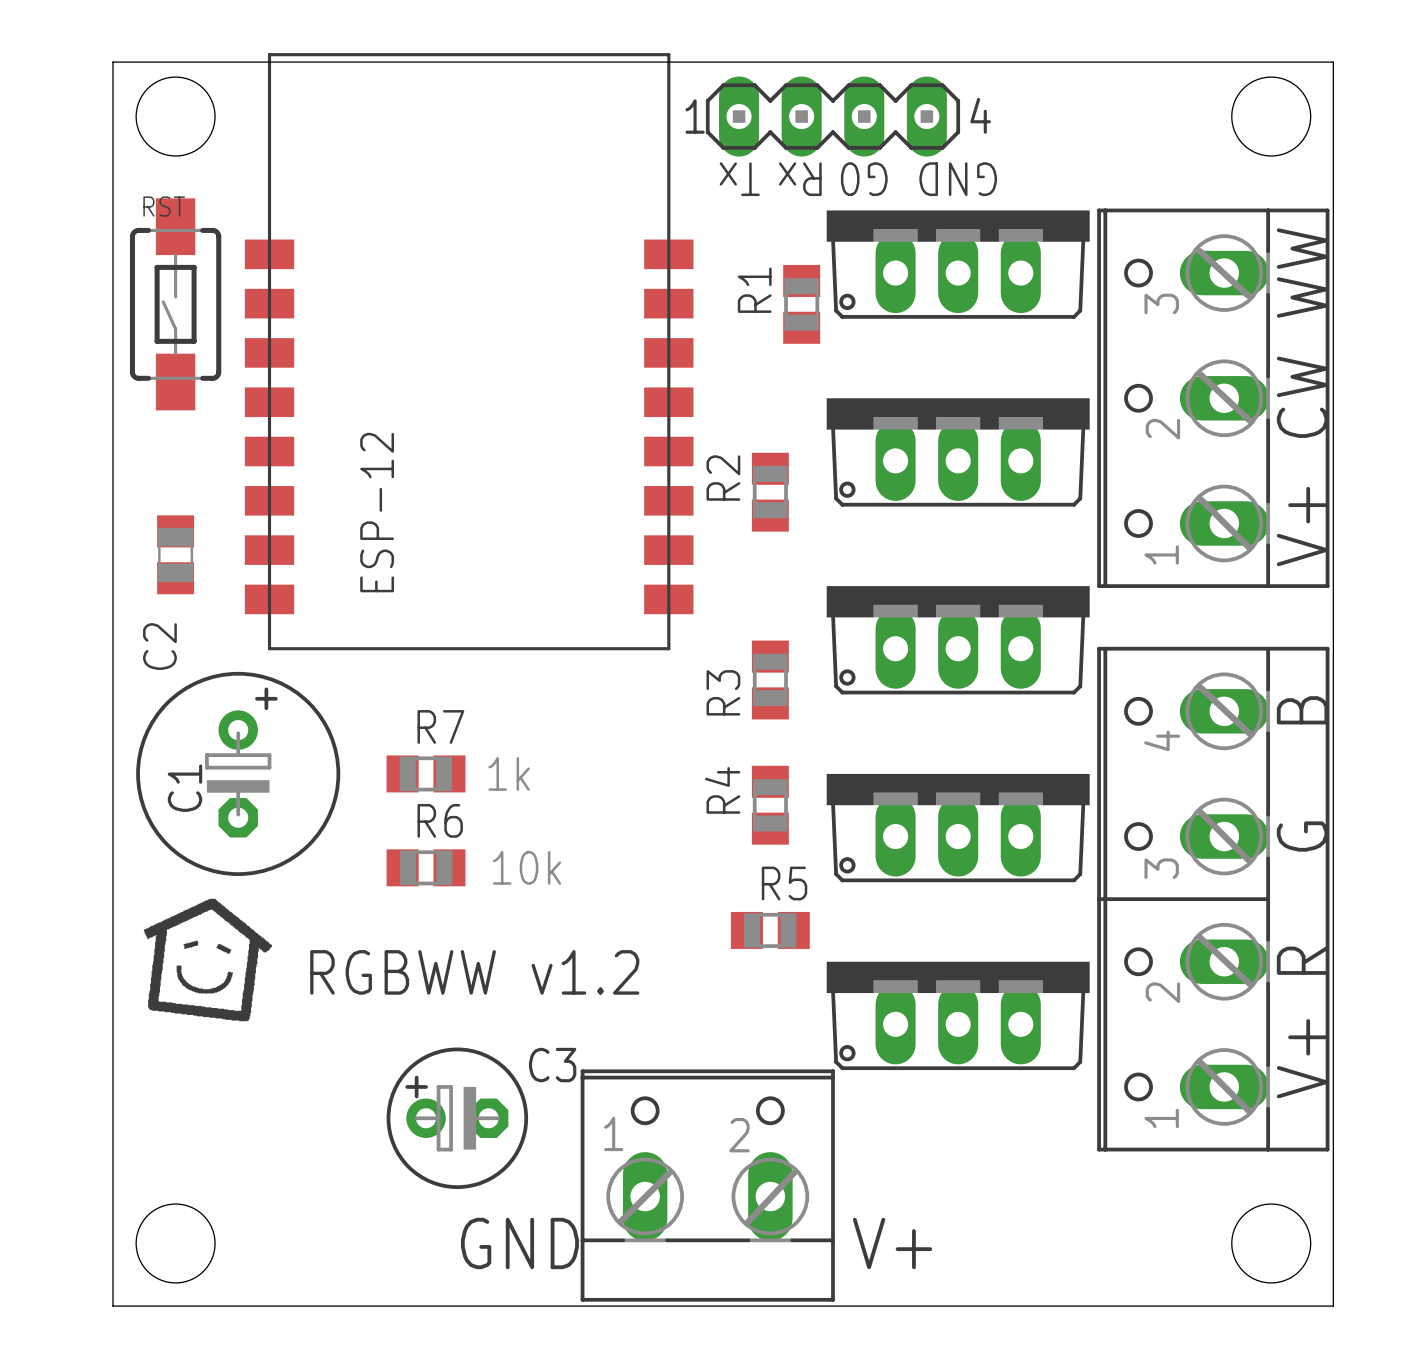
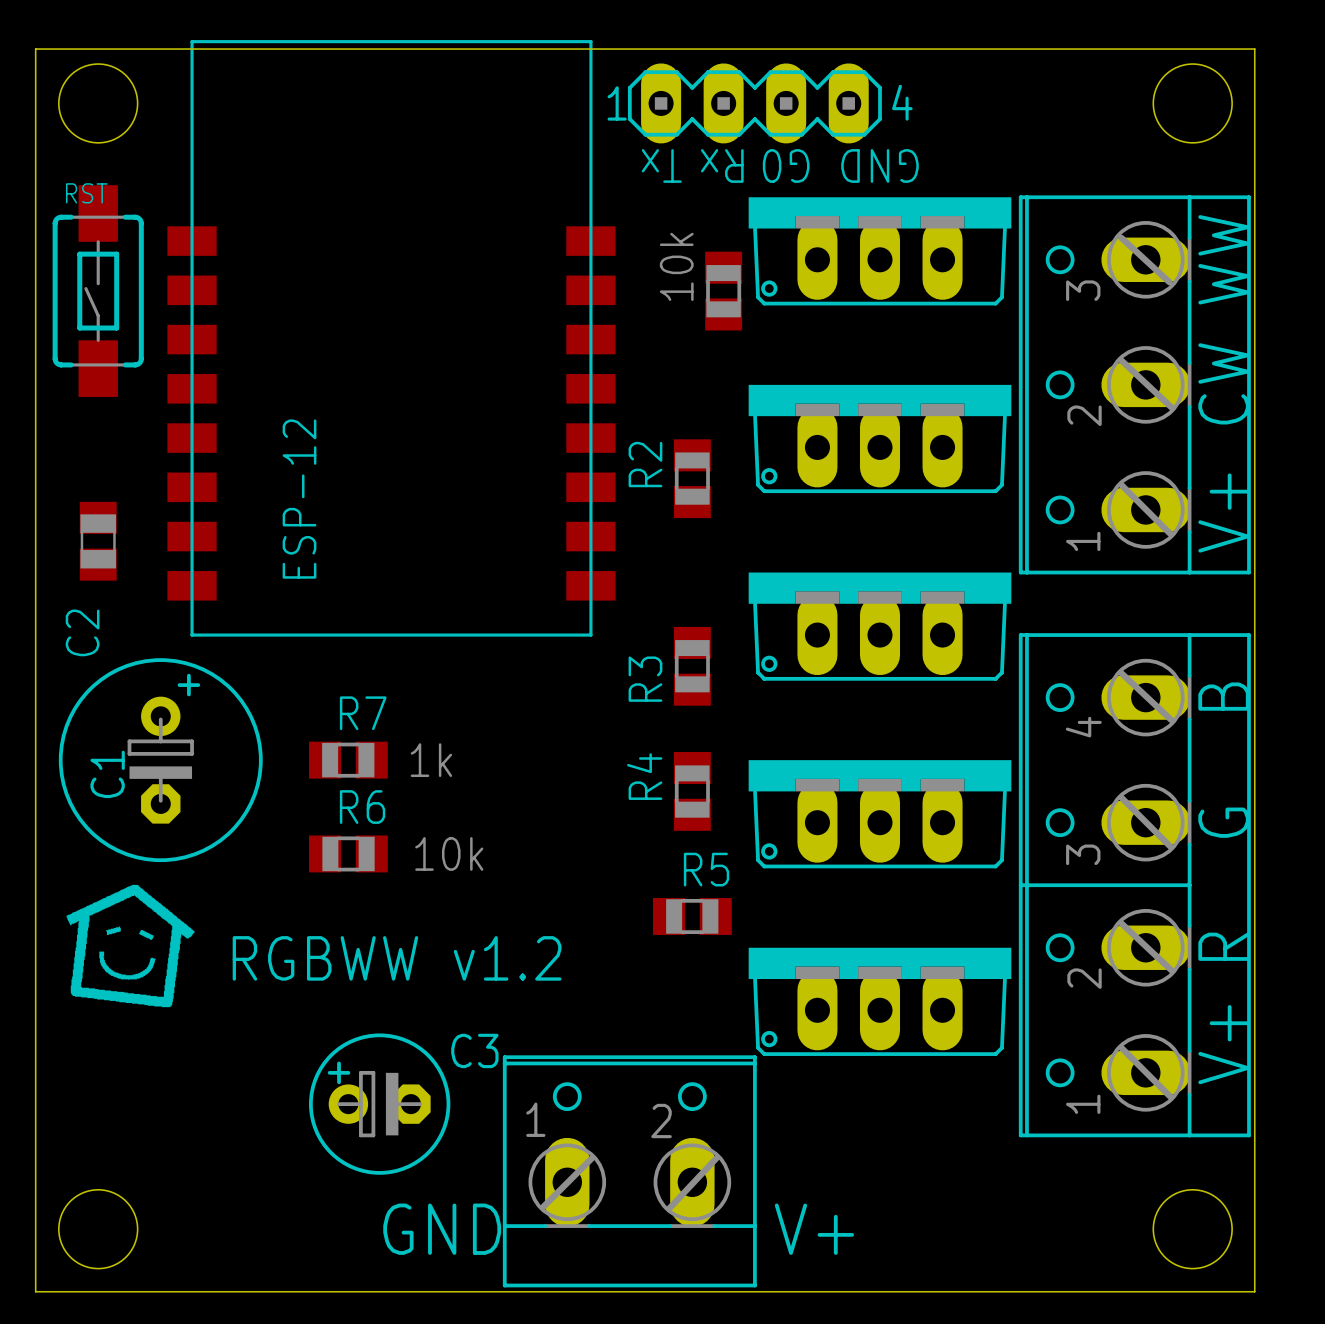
R1 value: none -> 10k (676, 266)
R1 name: R1 (754, 290) -> none

